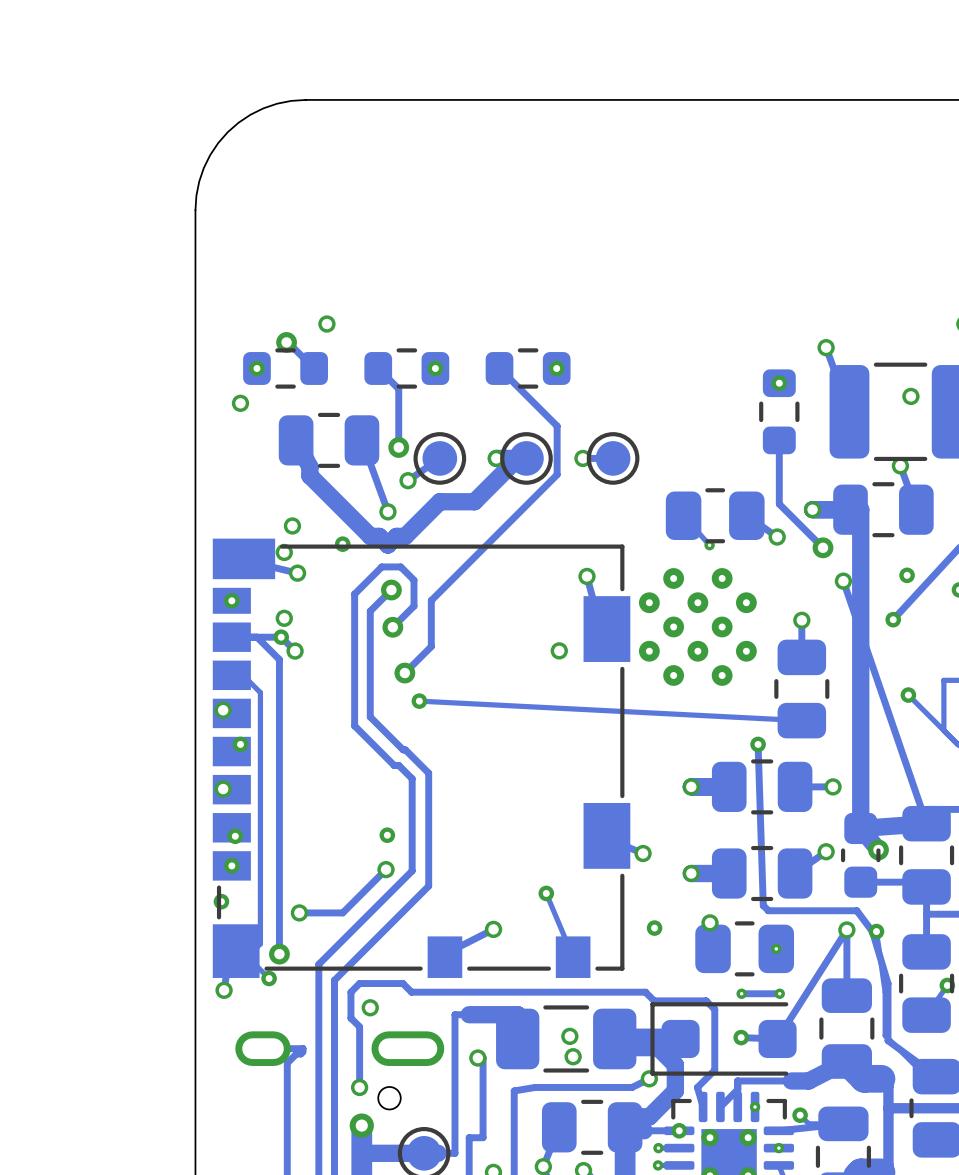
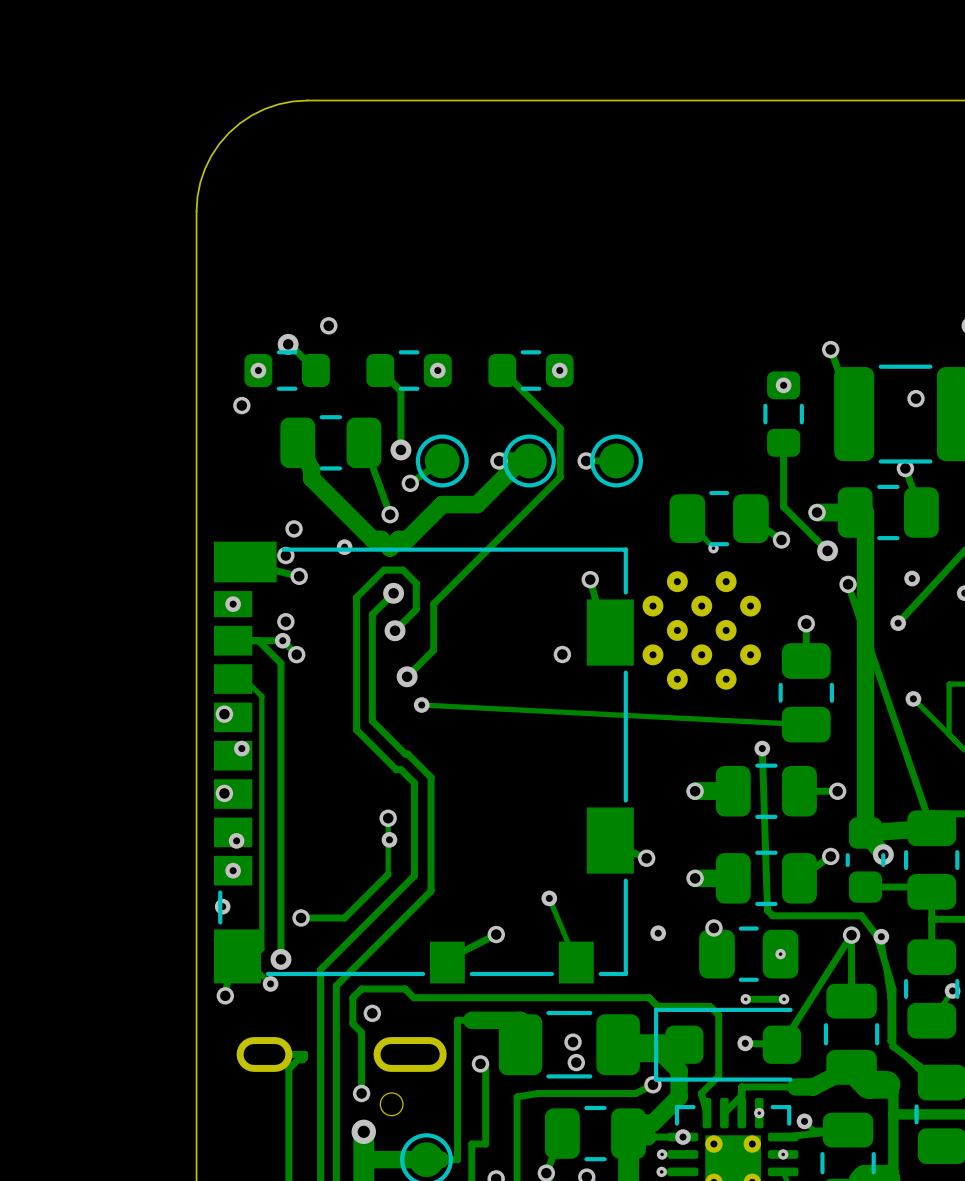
track: none -> (388, 818) (388, 874)
via position: (386, 869) -> (388, 818)

